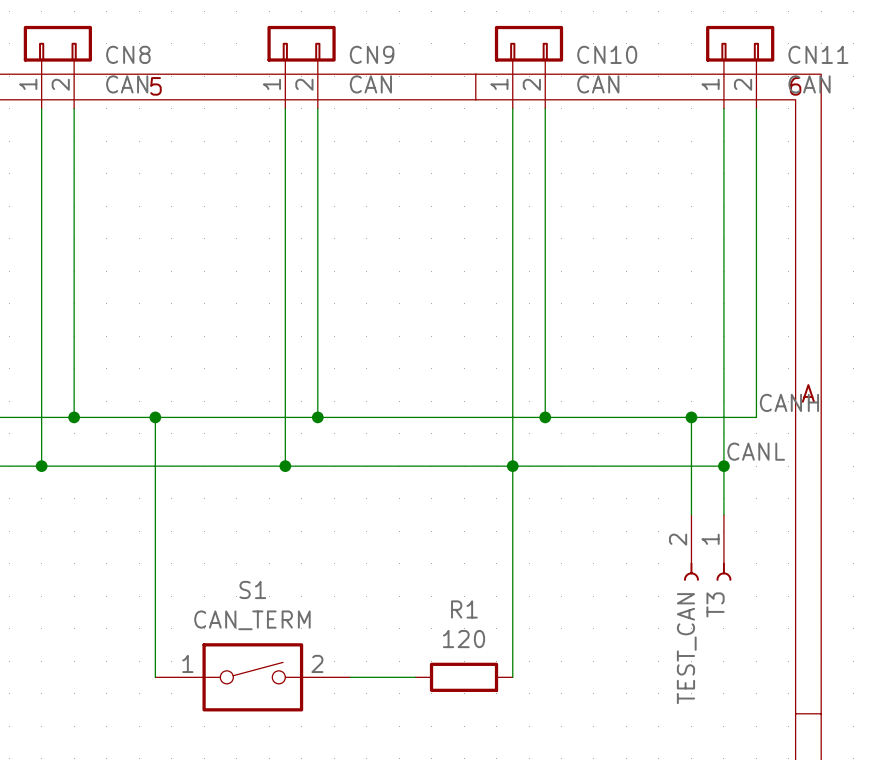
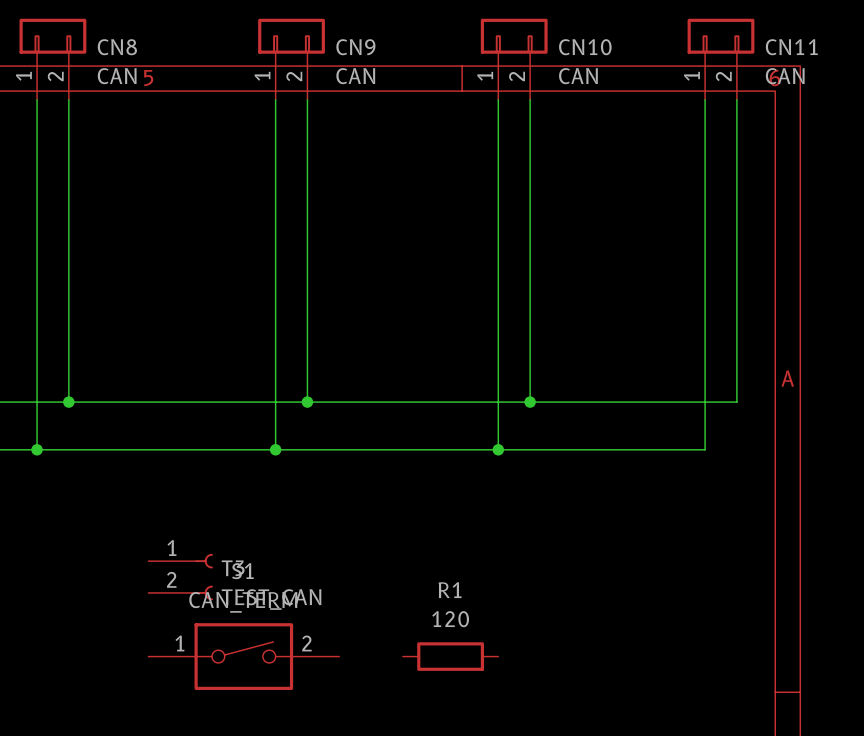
label: CANH (789, 402) -> none
wire: (155, 417) (155, 677) -> none
junction: (155, 417) -> none
wire: (691, 417) (691, 514) -> none
junction: (691, 417) -> none
label: CANL (756, 451) -> none
wire: (512, 466) (512, 677) -> none
wire: (723, 466) (723, 514) -> none
junction: (723, 466) -> none
T3 position: (707, 547) -> (180, 577)
T3 rotation: 0° (707, 571) -> 90° counterclockwise (204, 577)
wire: (350, 677) (415, 677) -> none

